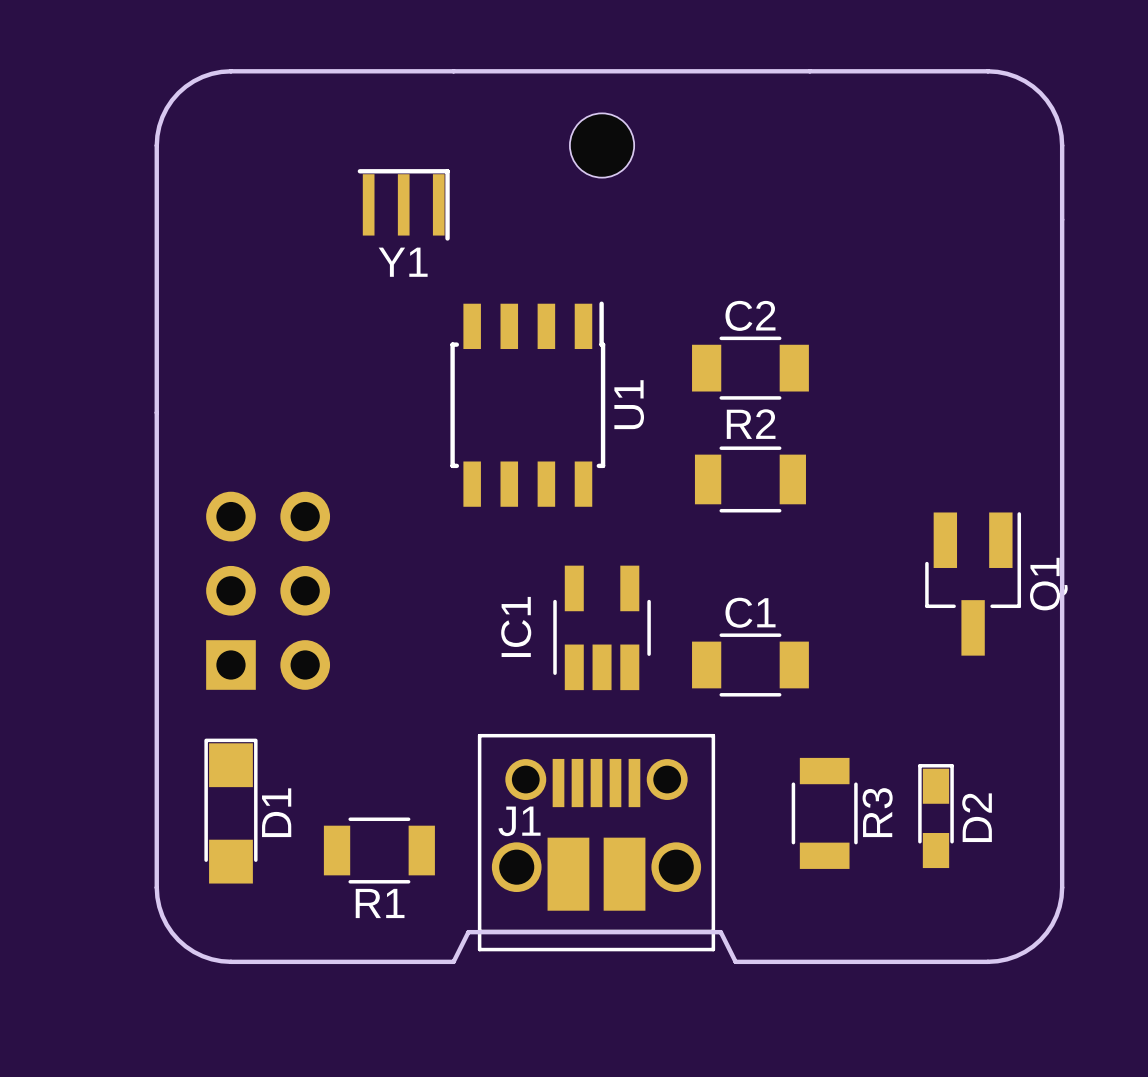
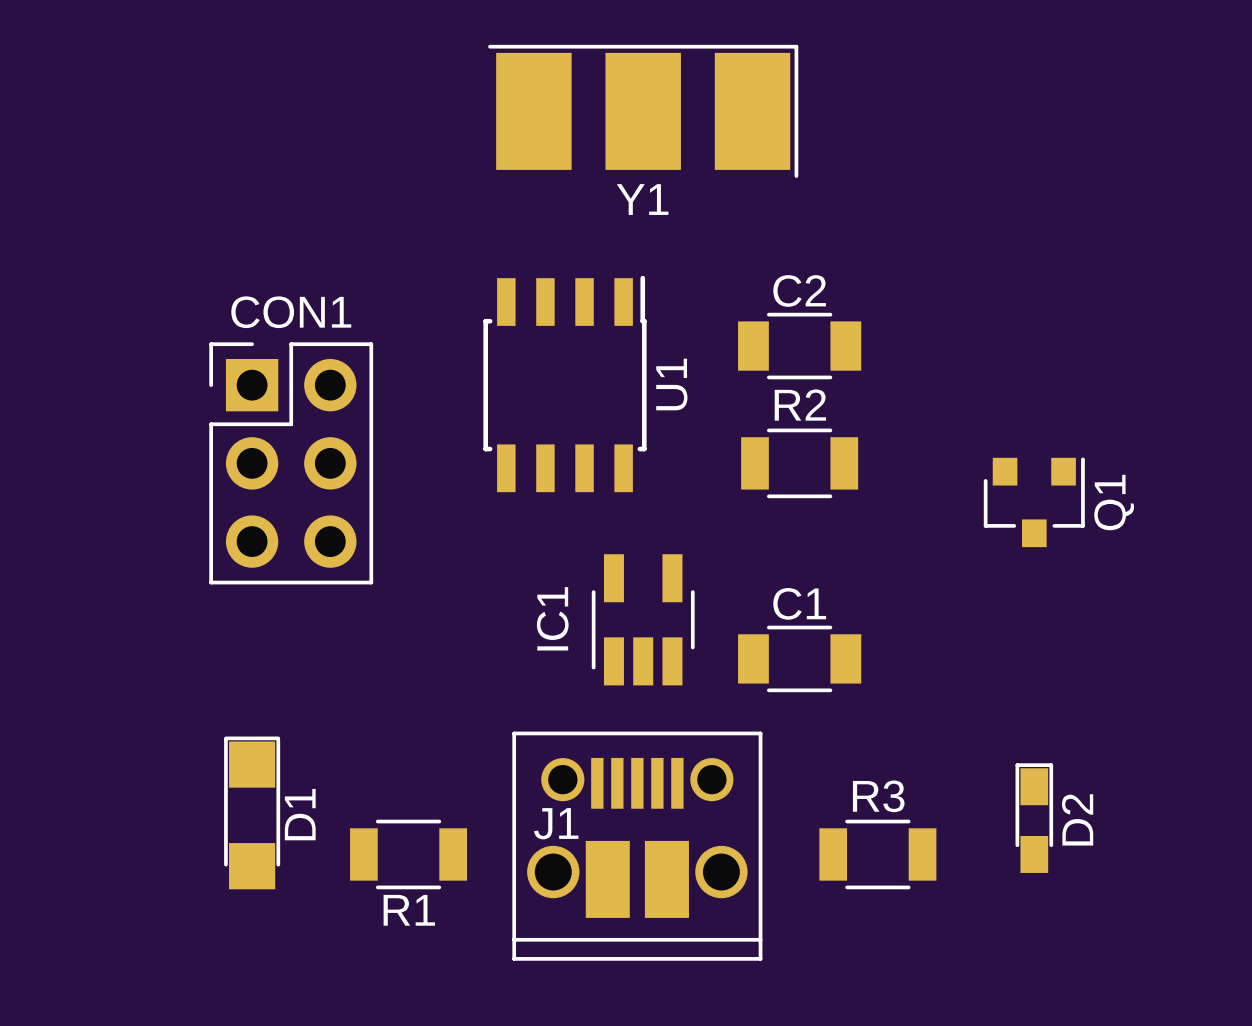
board edge: (230, 71) (987, 71) (1016, 76) (1040, 93) (1056, 117) (1062, 145) (1062, 887) (1056, 916) (1040, 940) (1016, 956) (987, 961) (735, 961) (720, 932) (468, 932) (453, 961) (221, 961) (193, 951) (178, 940) (162, 916) (156, 887) (156, 145) (162, 117) (178, 93) (202, 76) (230, 71) -> none
part: (602, 145) -> none
Y1 footprint: [357, 169, 450, 241] -> [488, 44, 799, 178]
Q1 footprint: [925, 512, 1022, 656] -> [983, 457, 1085, 548]
CON1 side: bottom (268, 590) -> top (291, 463)
R3 name position: R3 (877, 812) -> R3 (878, 796)
R3 rotation: 0° (824, 813) -> 90° clockwise (877, 854)
D2 position: (935, 816) -> (1034, 818)

